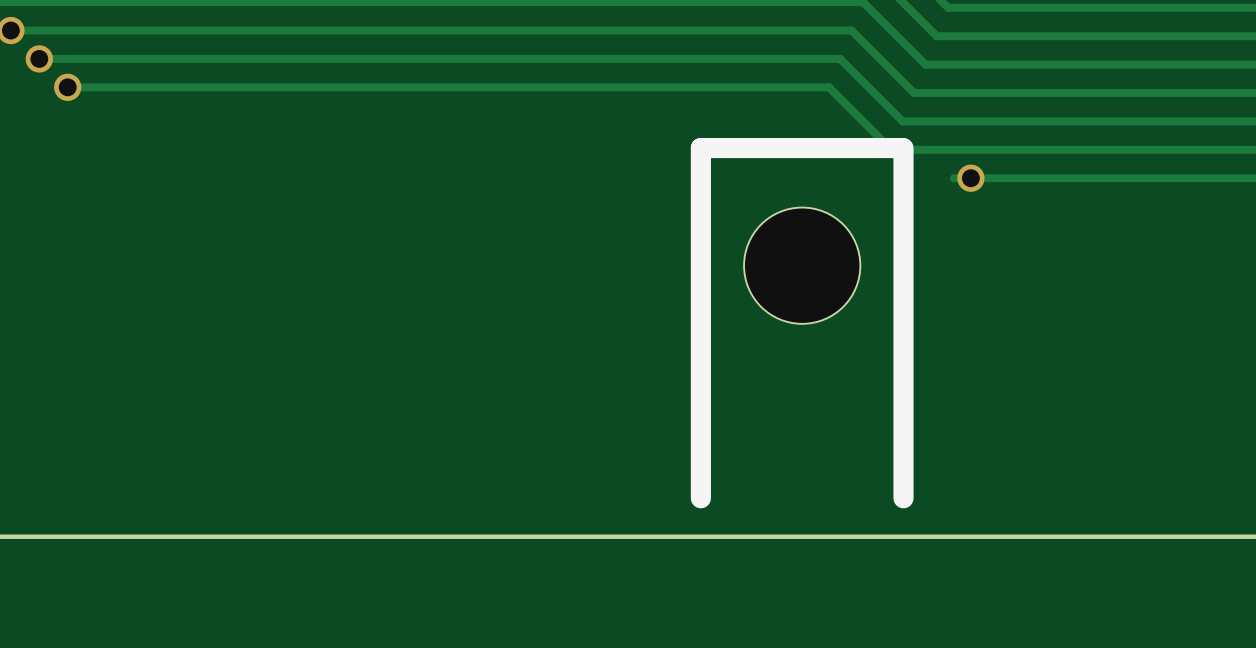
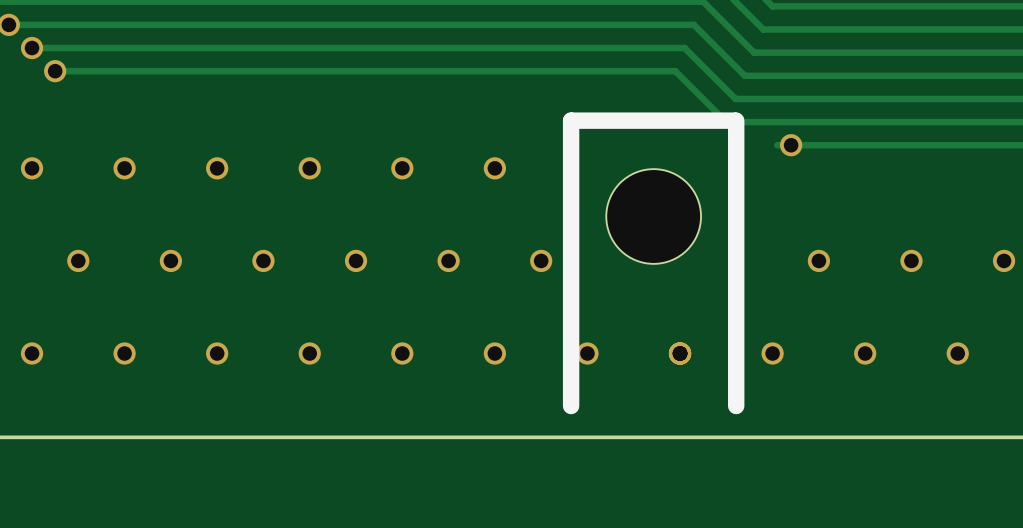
via: none -> (32, 168)
via: none -> (124, 168)
via: none -> (217, 168)
via: none -> (309, 168)
via: none -> (402, 168)
via: none -> (494, 168)
via: none -> (78, 260)
via: none -> (170, 260)
via: none -> (263, 260)
via: none -> (356, 260)
via: none -> (448, 260)
via: none -> (541, 260)
via: none -> (818, 260)
via: none -> (911, 260)
via: none -> (1004, 260)
via: none -> (32, 353)
via: none -> (124, 353)
via: none -> (217, 353)
via: none -> (309, 353)
via: none -> (402, 353)
via: none -> (494, 353)
via: none -> (587, 353)
via: none -> (680, 353)
via: none -> (772, 353)
via: none -> (865, 353)
via: none -> (957, 353)

